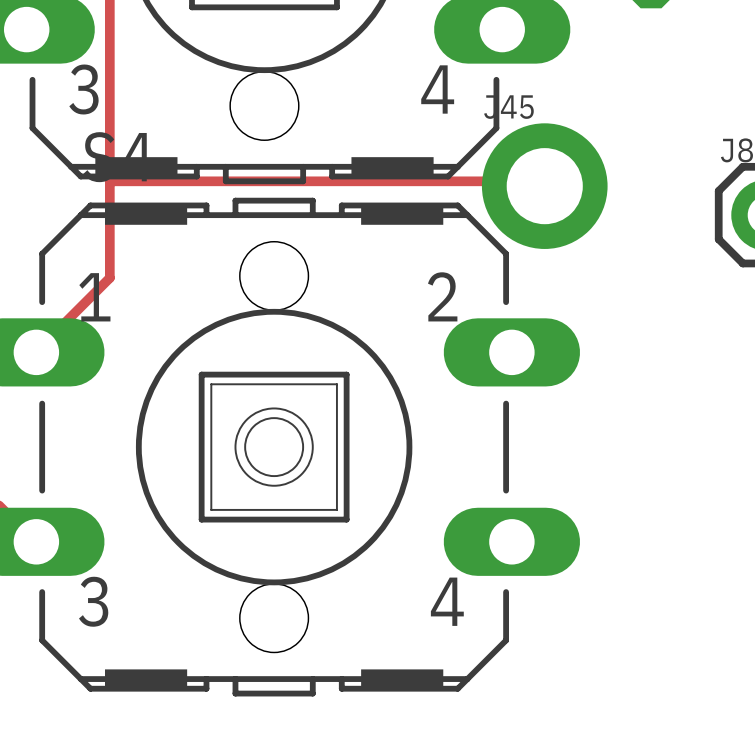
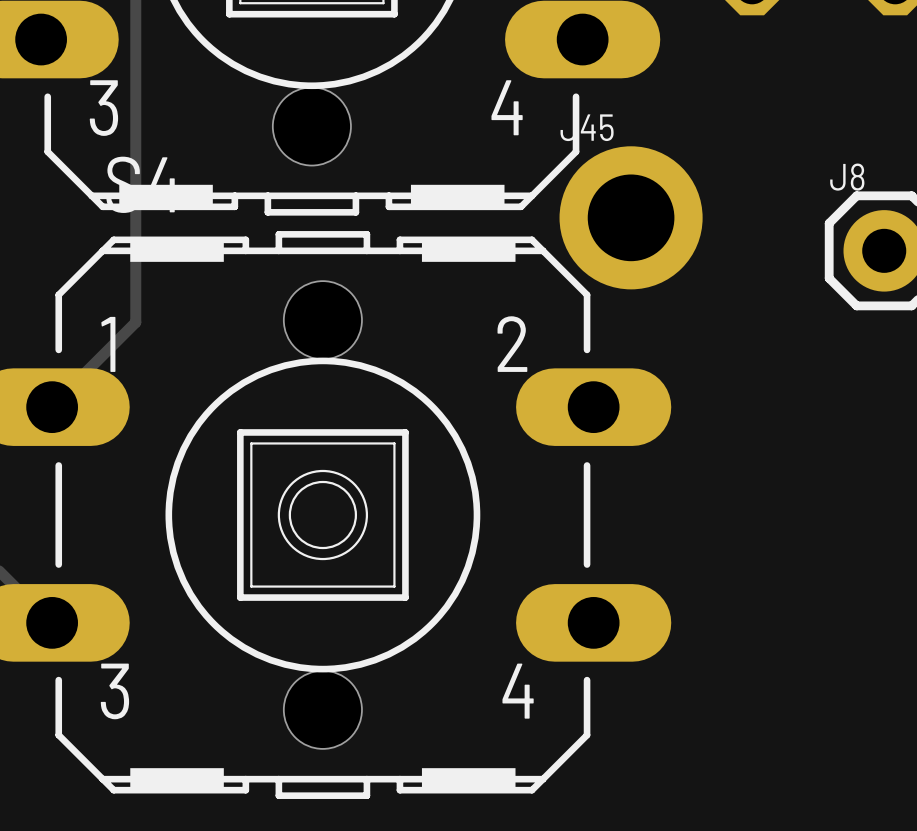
track: (109, 181) (544, 181) (544, 186) -> none

